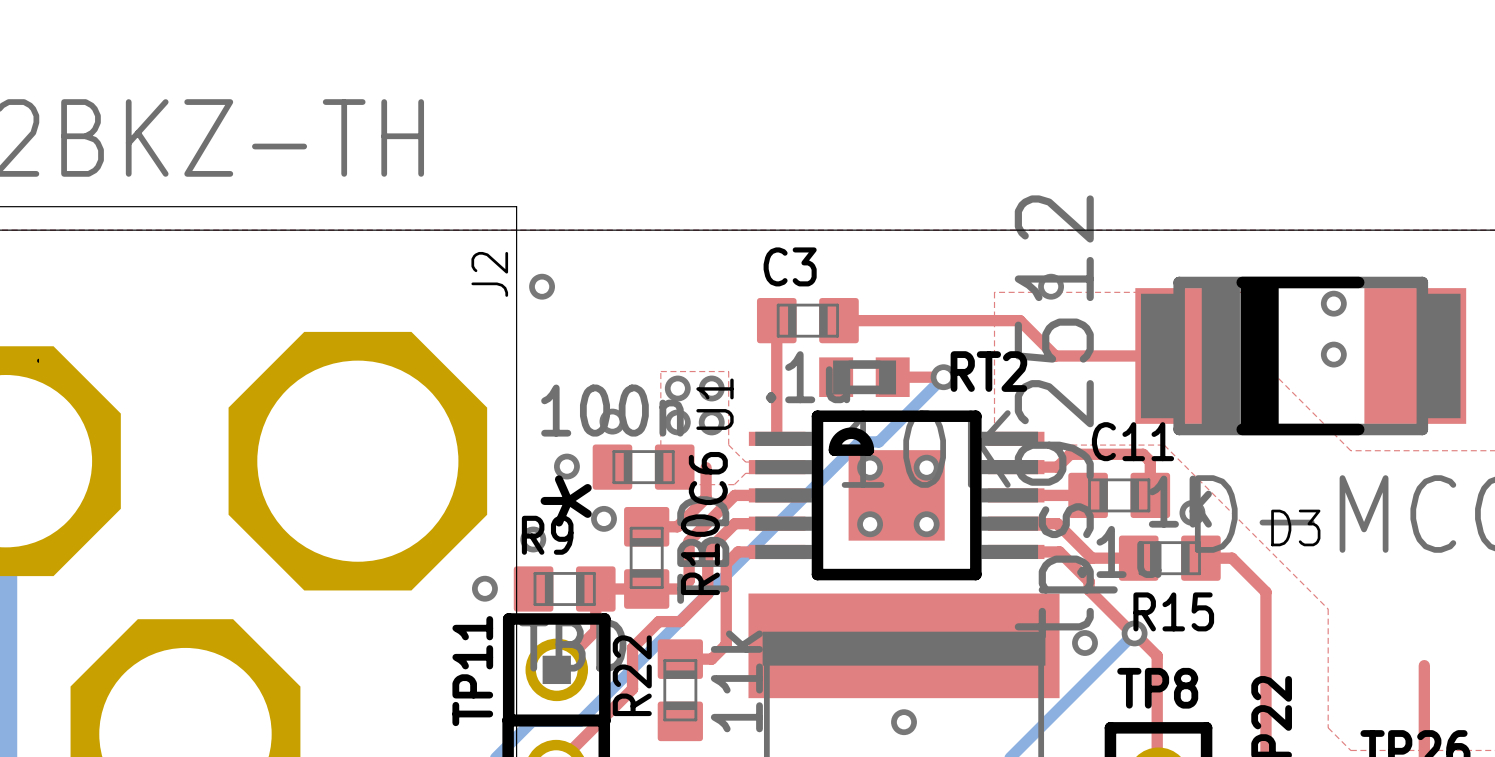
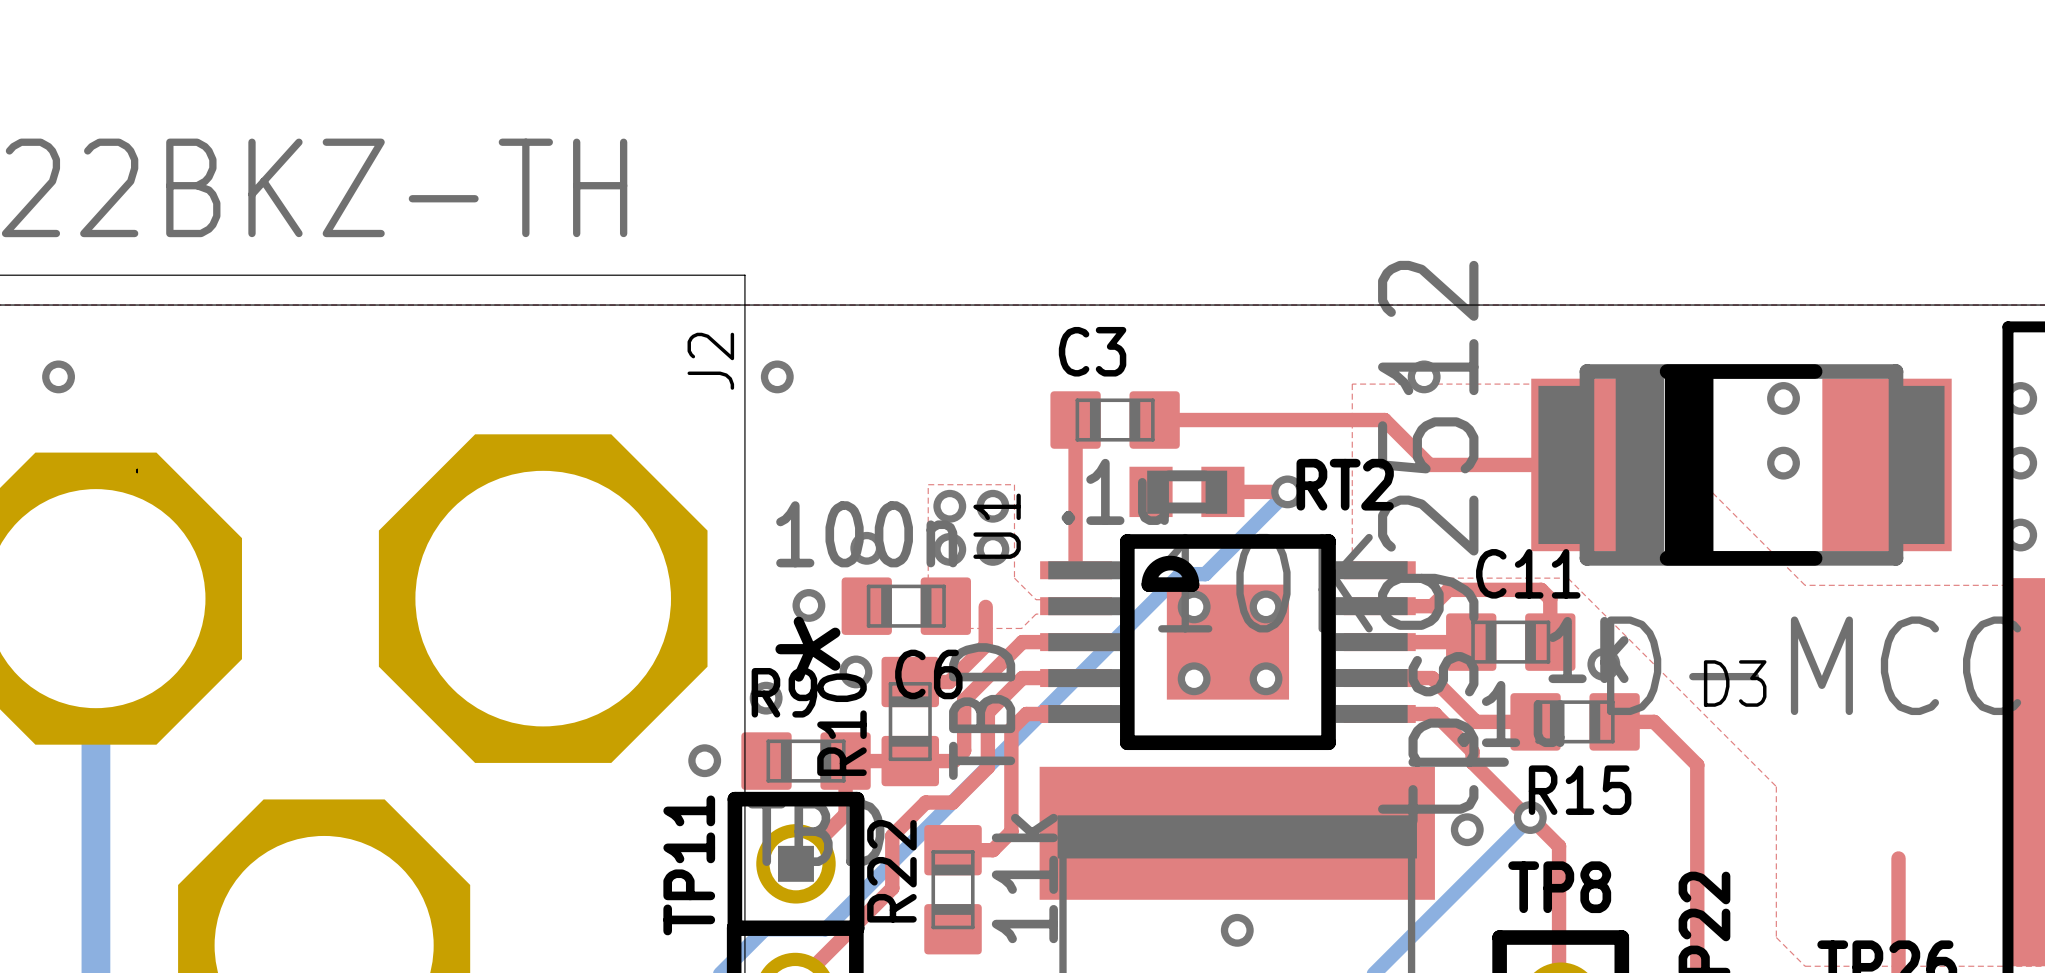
C6 name rotation: 0° (708, 478) -> 90° clockwise (928, 674)
R10 name position: R10 (700, 554) -> R10 (841, 724)

